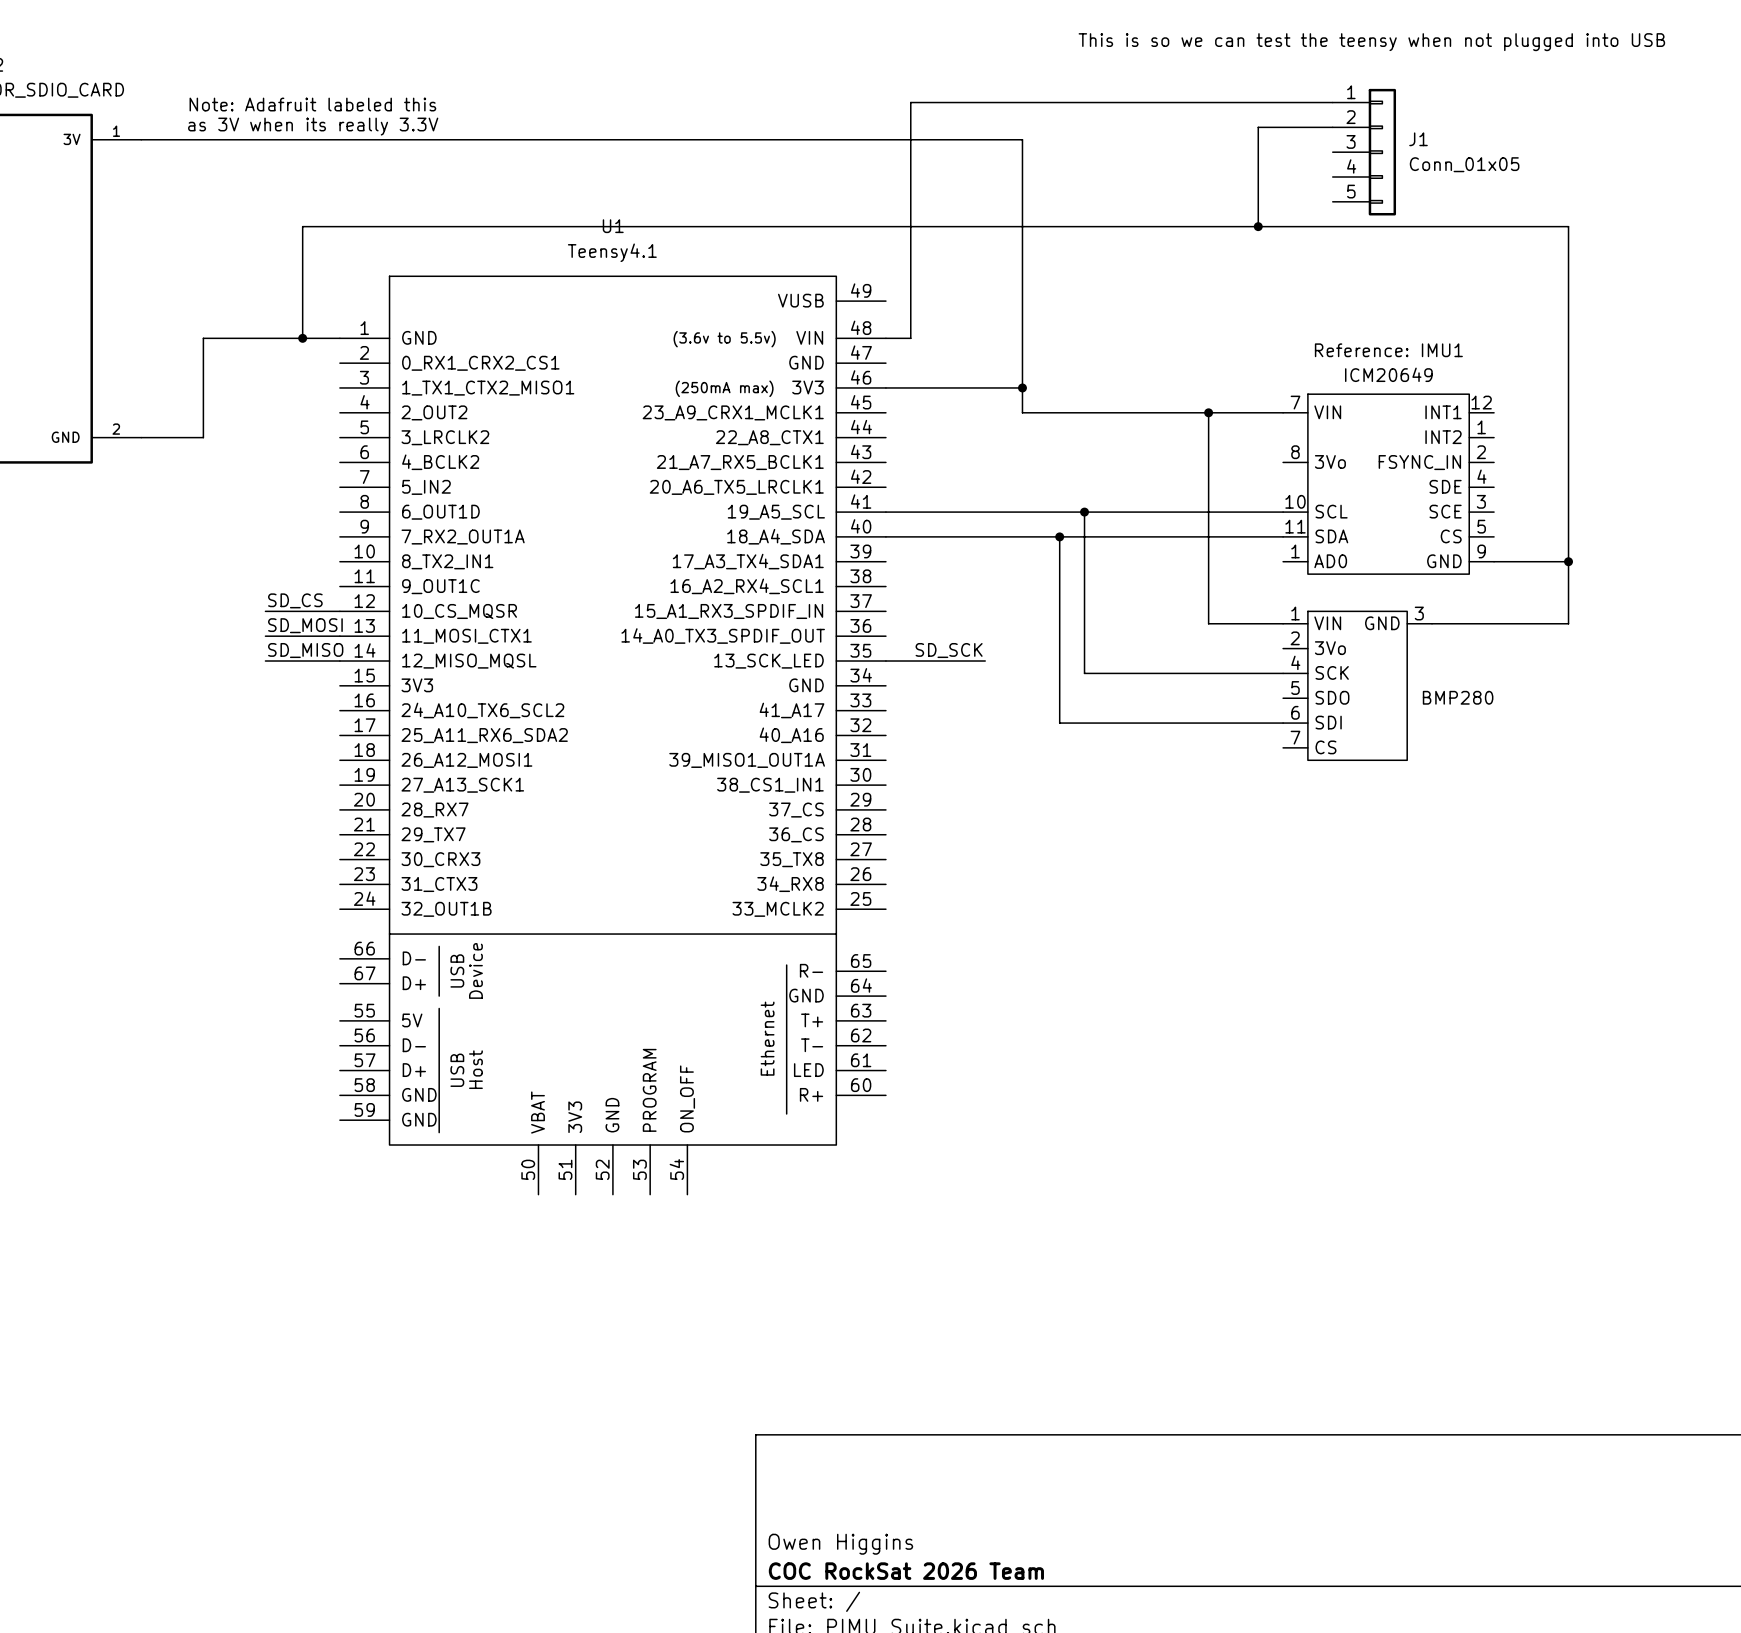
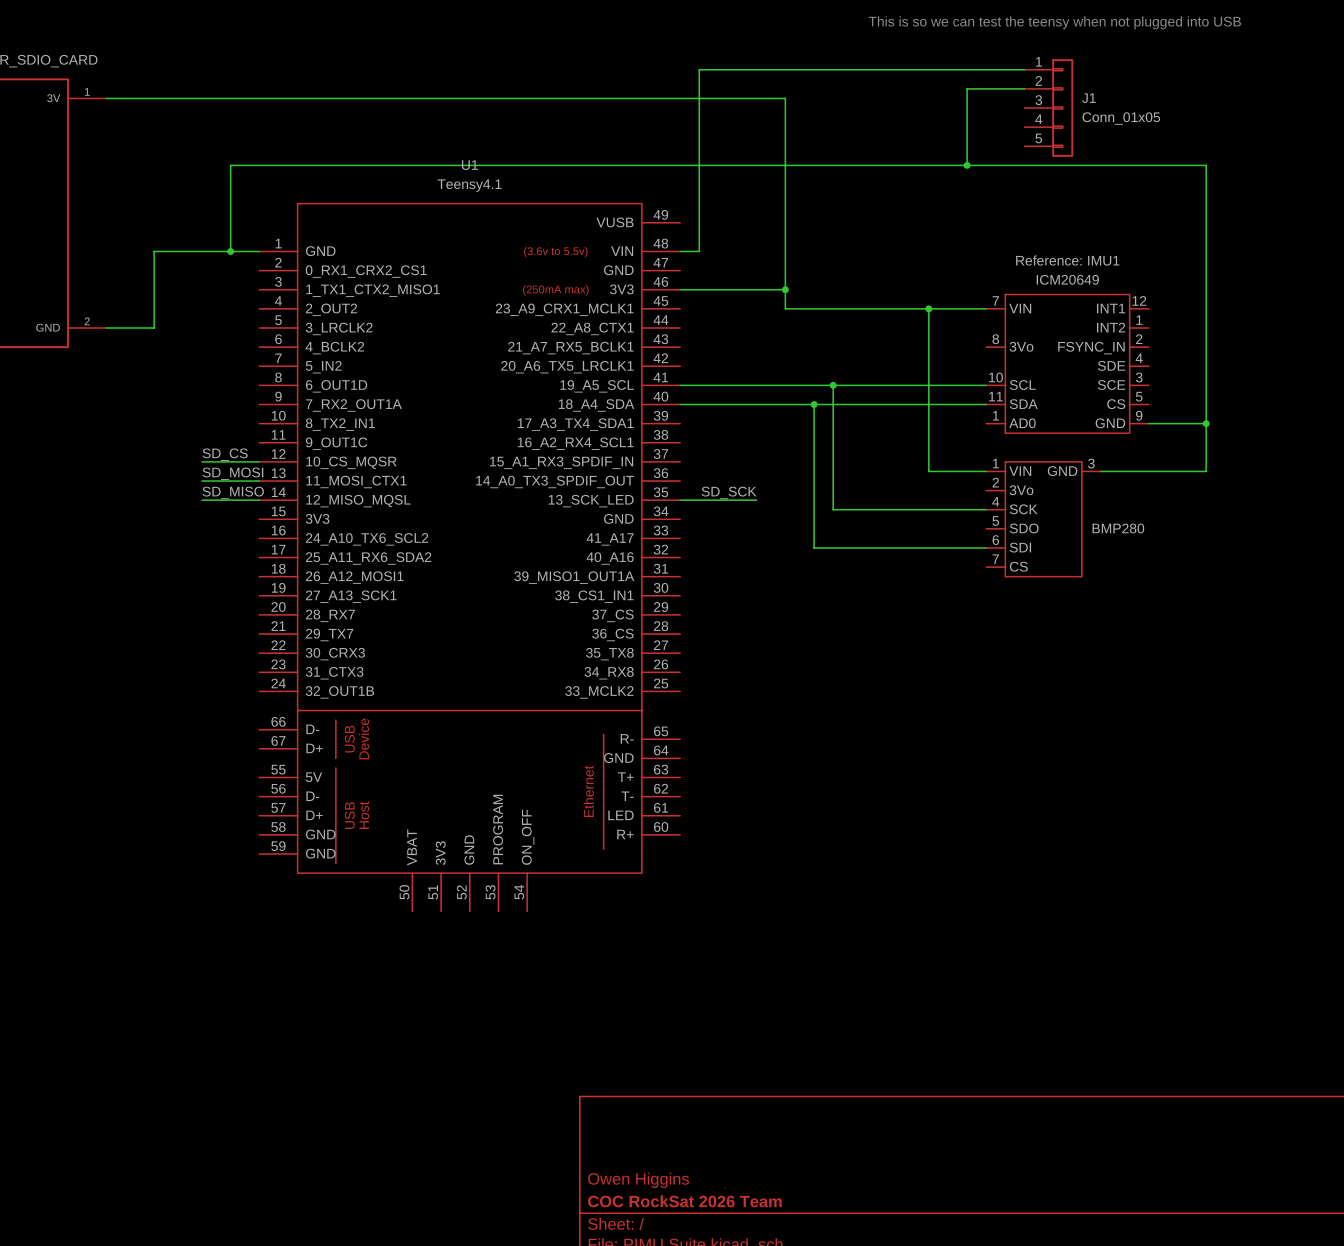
text: Note: Adafruit labeled this (312, 104) -> none
text: as 3V when its really 3.3V (313, 126) -> none

